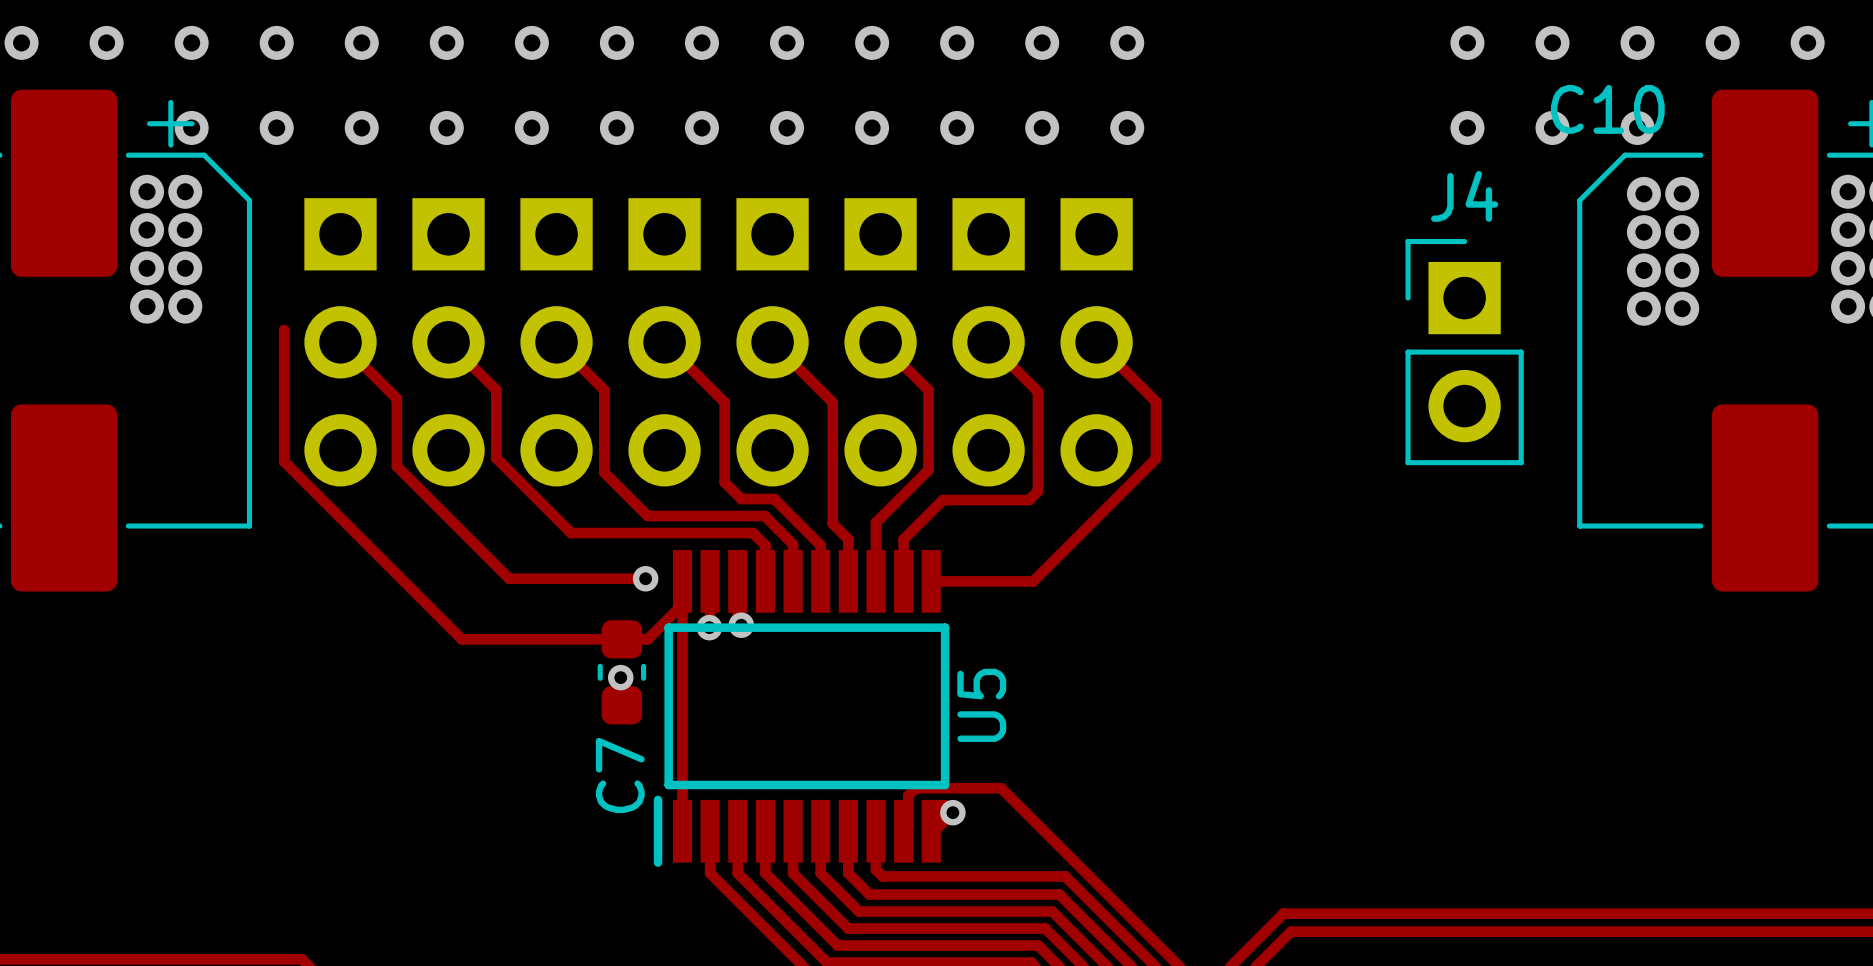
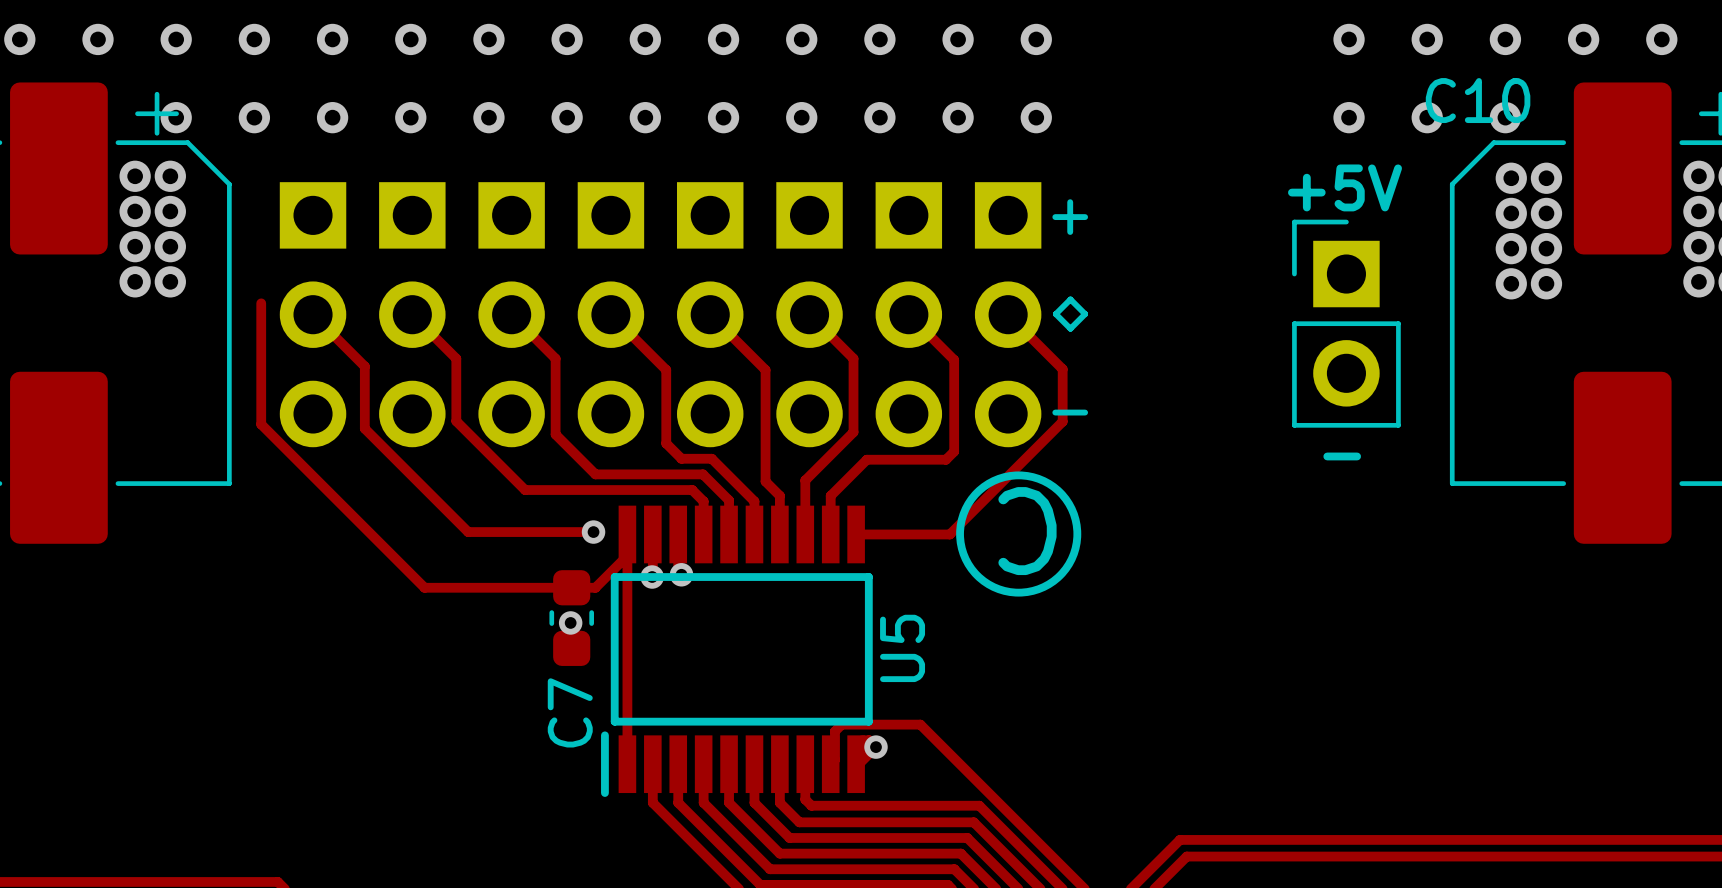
J4 name: J4 (1464, 196) -> none
text: none -> +5V (1344, 187)
text: none -> + (1070, 217)
line: none -> (1070, 299) (1055, 314) (1070, 328) (1085, 314) (1070, 299)
text: none -> - (1070, 412)
text: none -> - (1342, 456)
drawing: none -> [956, 471, 1082, 597]
text: none -> C (1027, 531)

